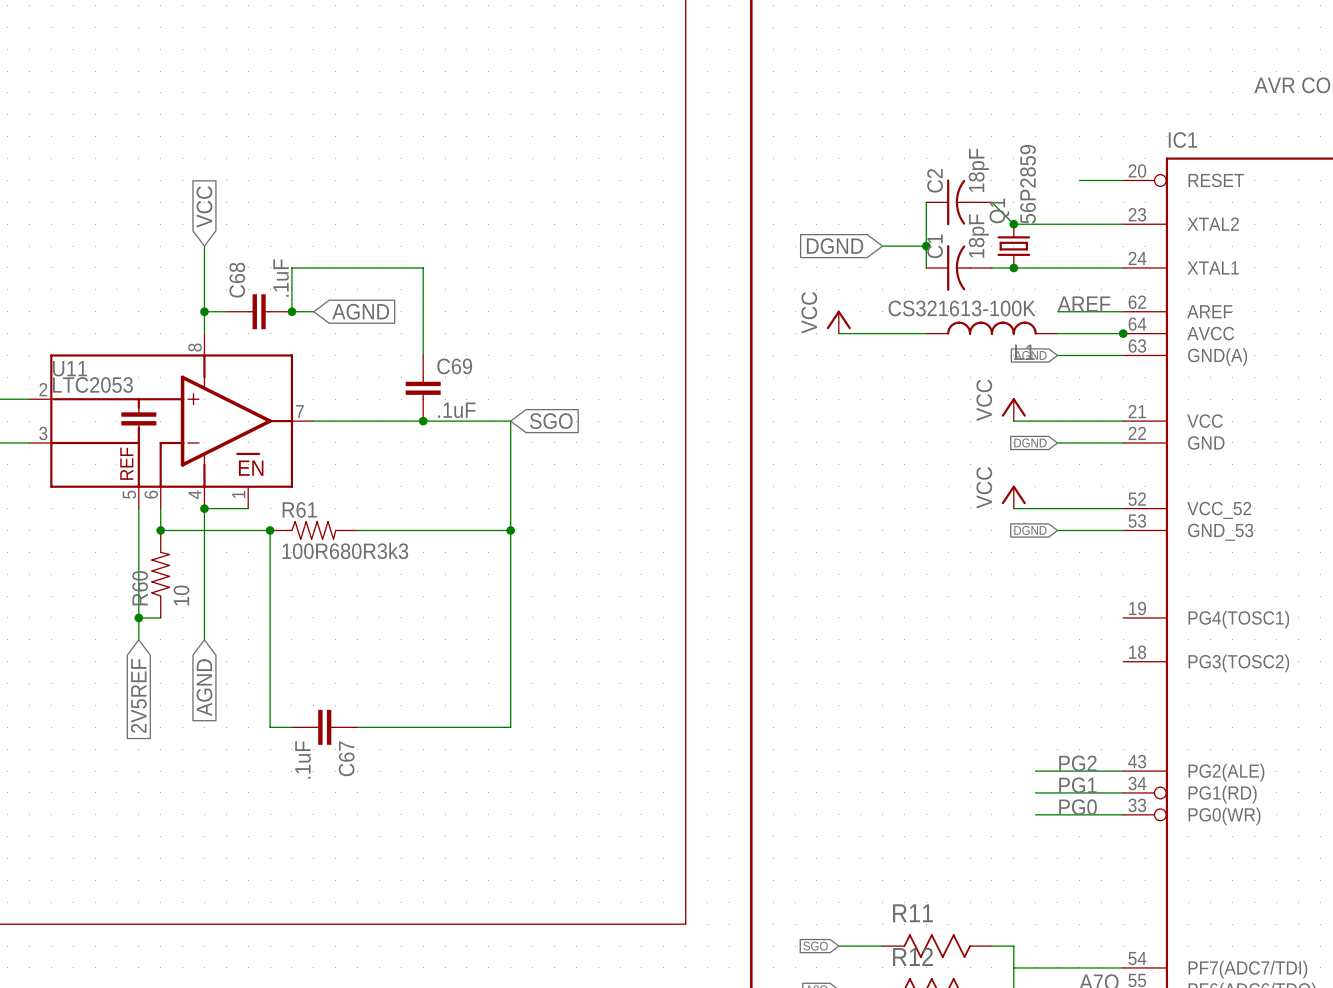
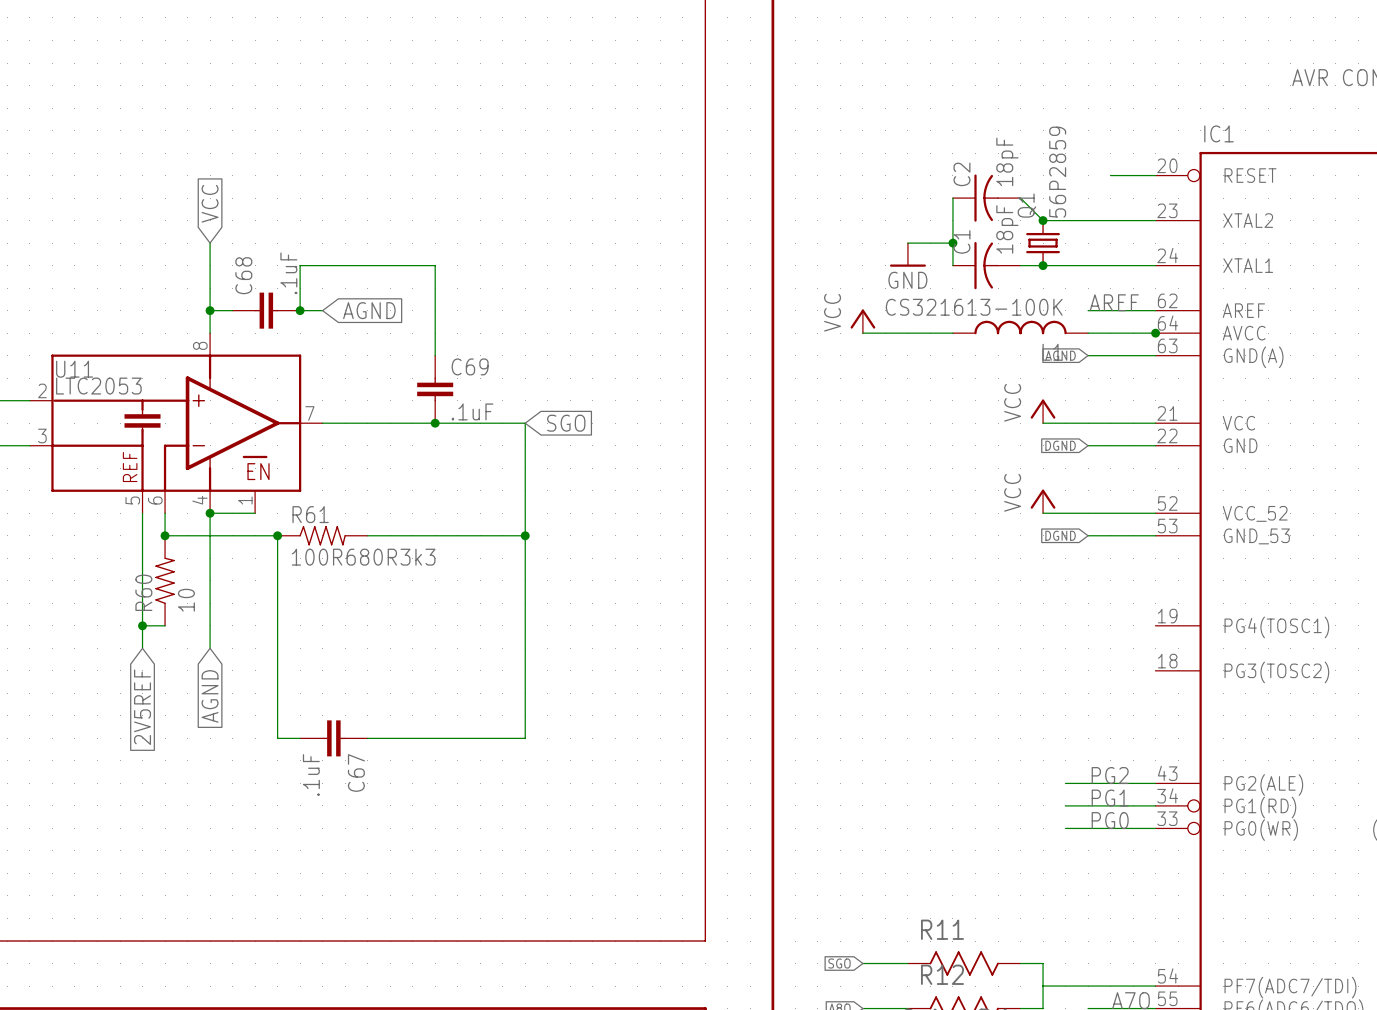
global label: DGND (835, 246) -> none
power symbol: none -> GND (907, 254)

